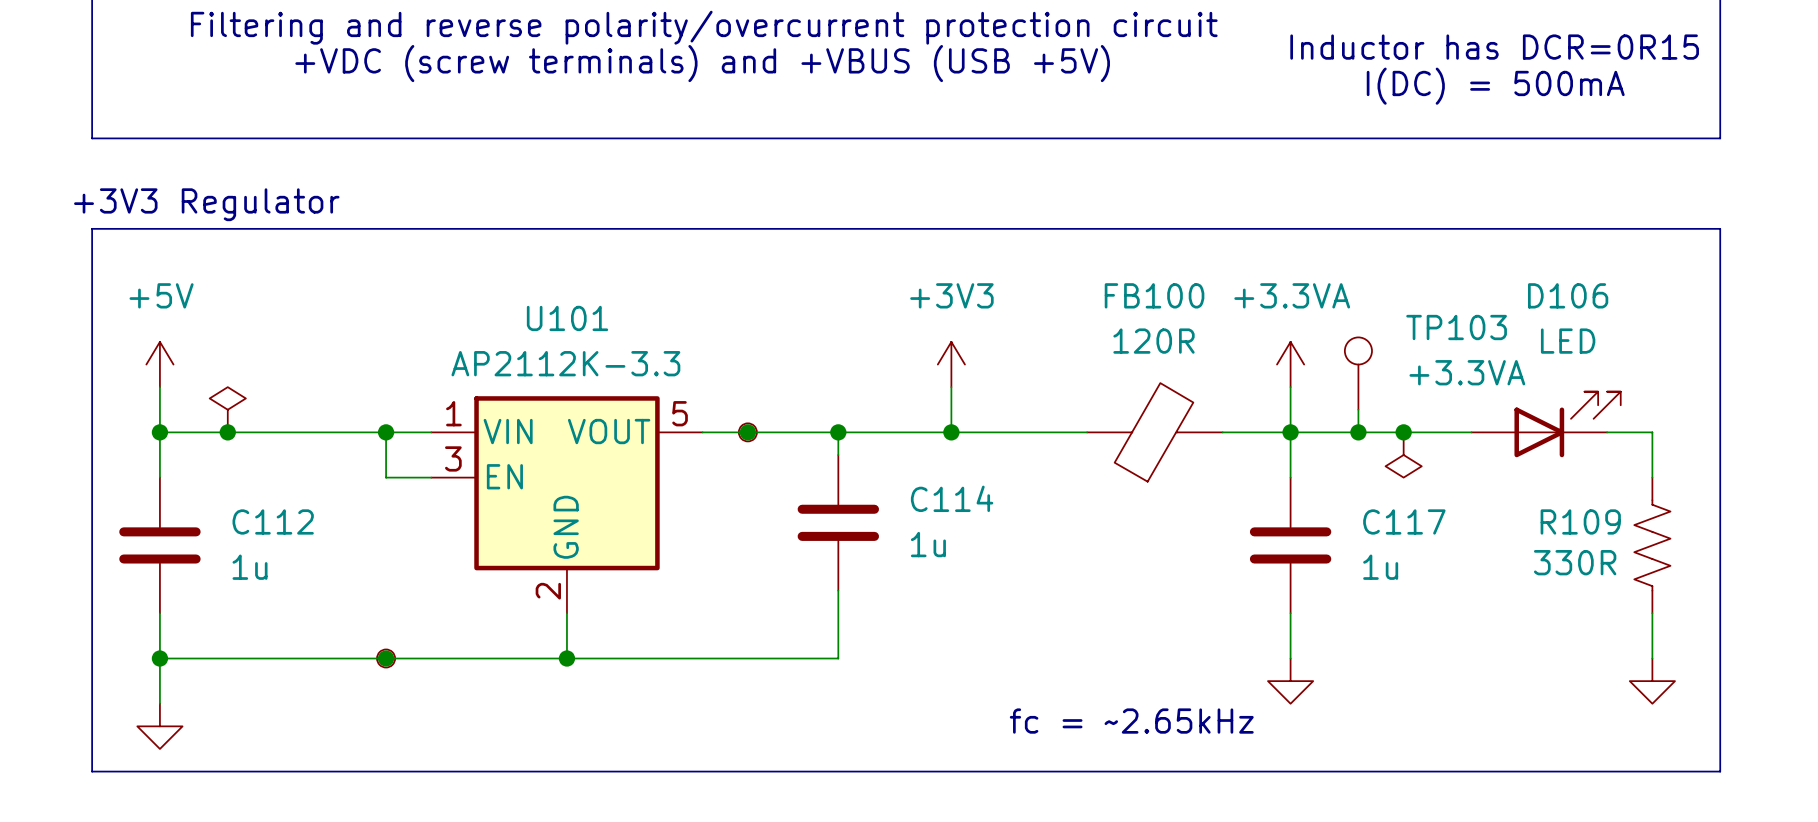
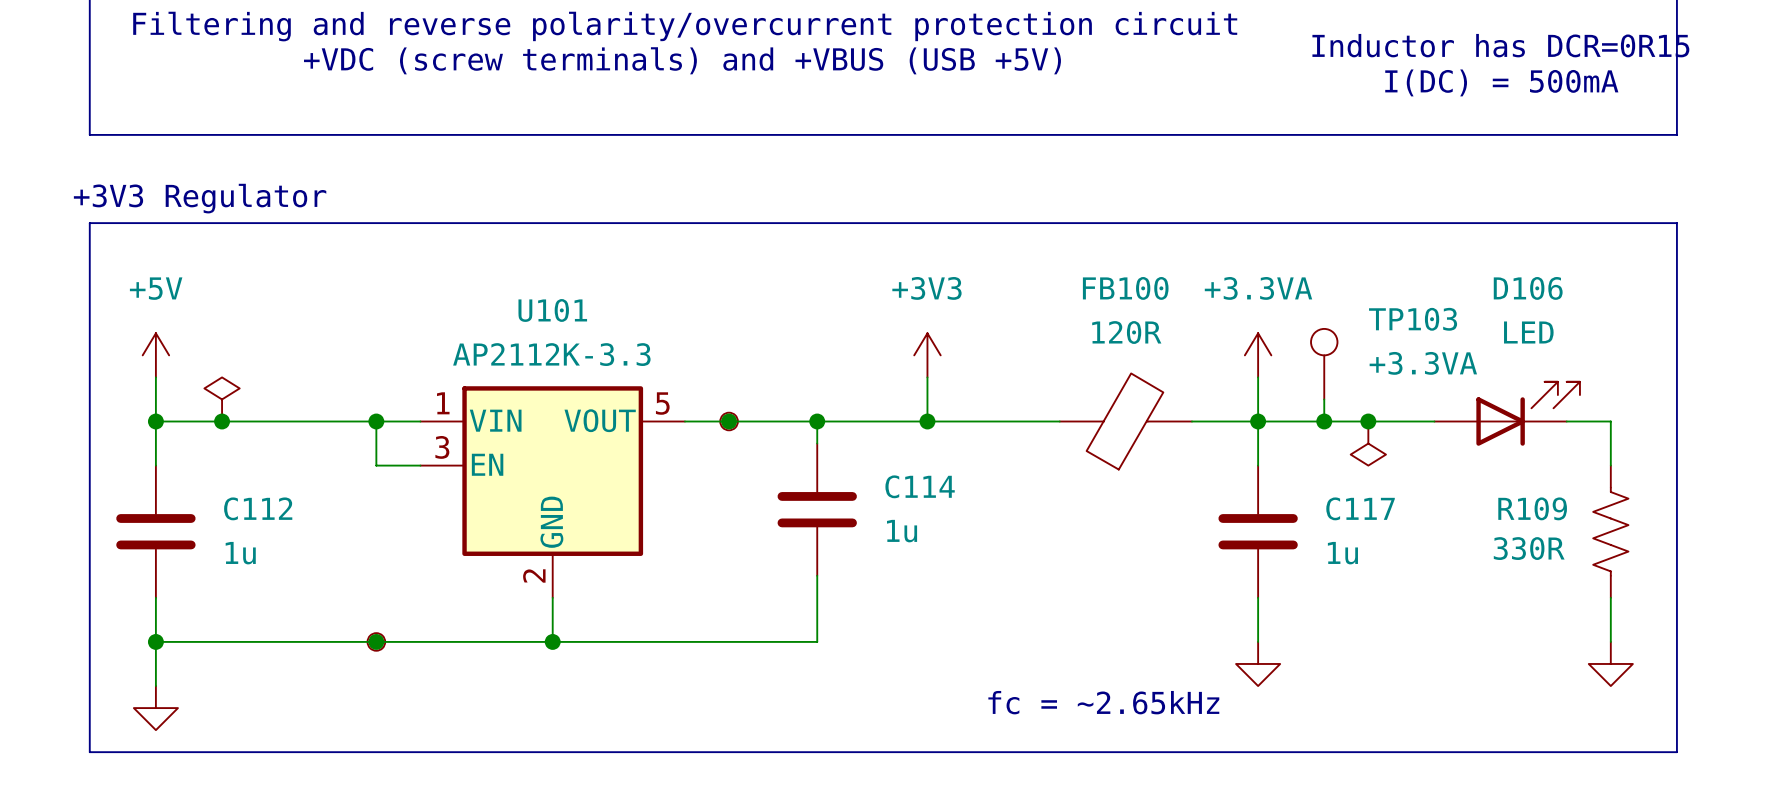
text position: Inductor has DCR=0R15 (1494, 47) -> Inductor has DCR=0R15 (1500, 45)
text position: I(DC) = 500mA (1495, 86) -> I(DC) = 500mA (1501, 82)

